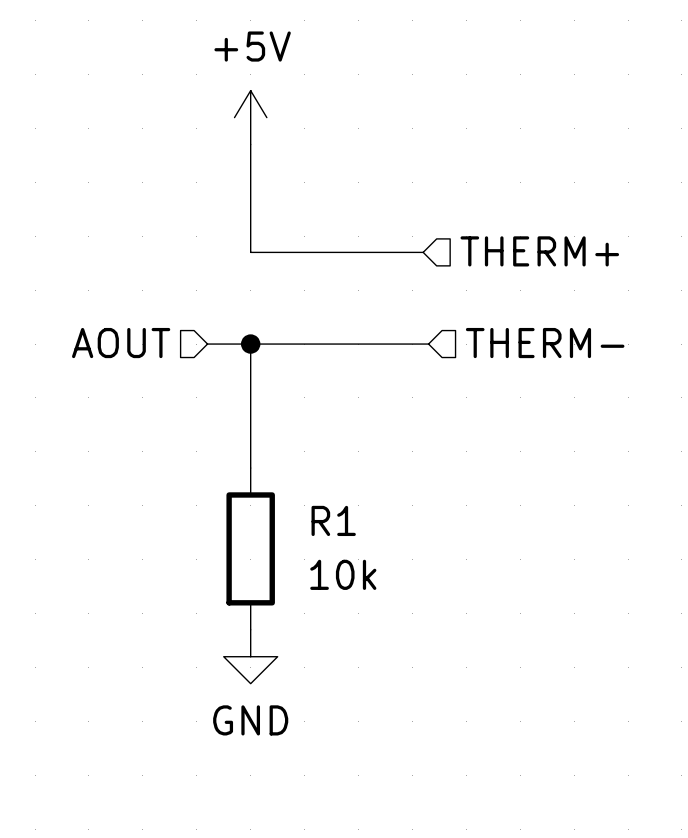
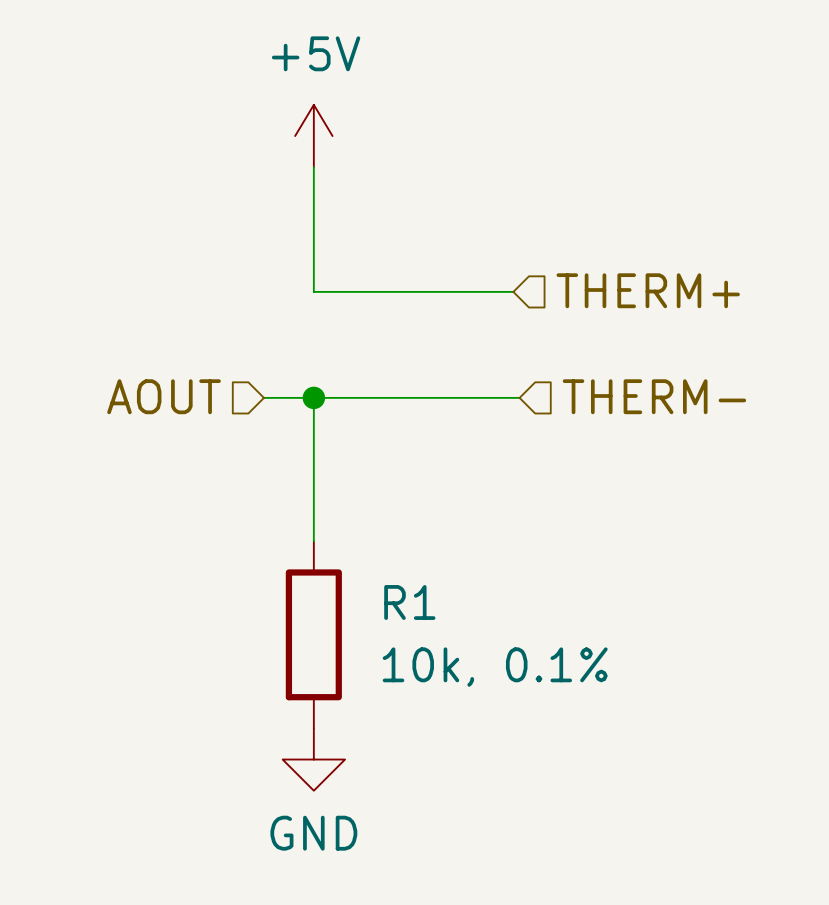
R1 value: 10k (343, 574) -> 10k, 0.1% (495, 667)

